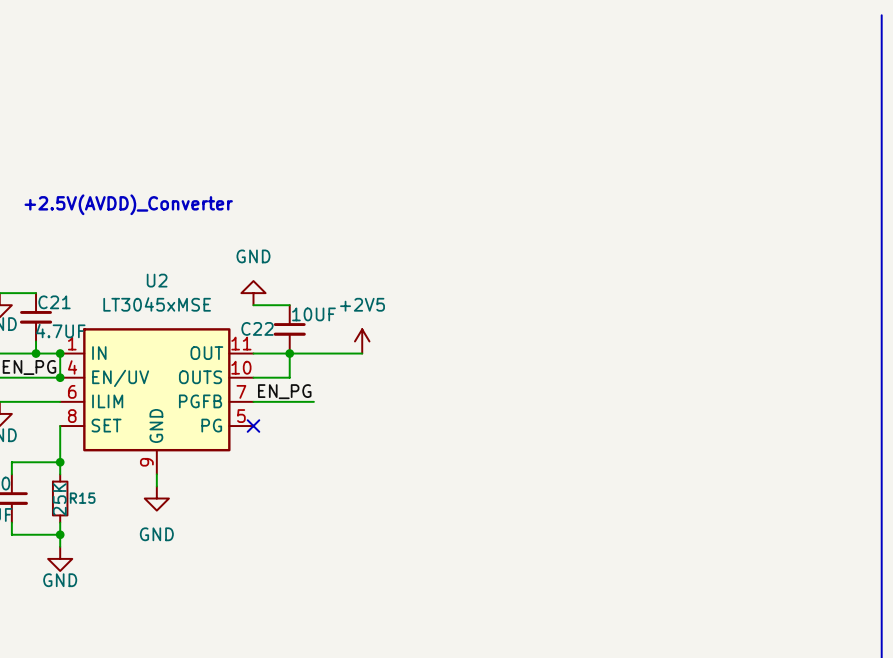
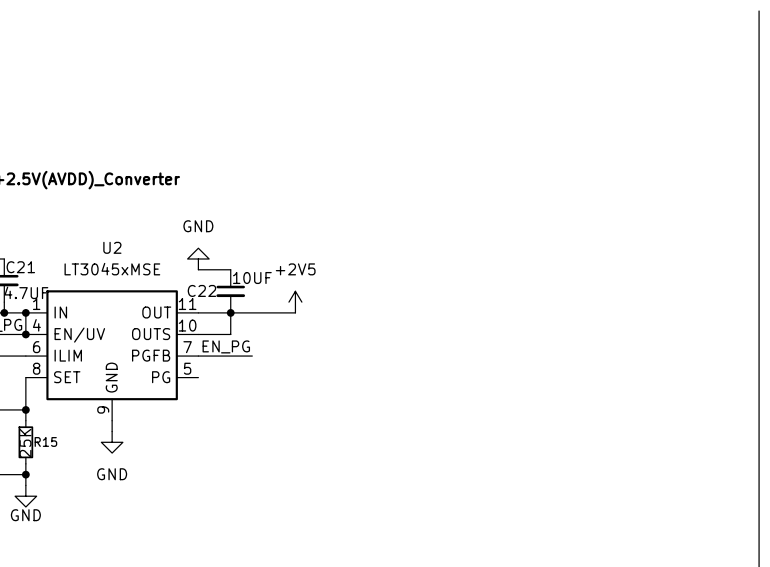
no-connect mark: (253, 426) -> none

